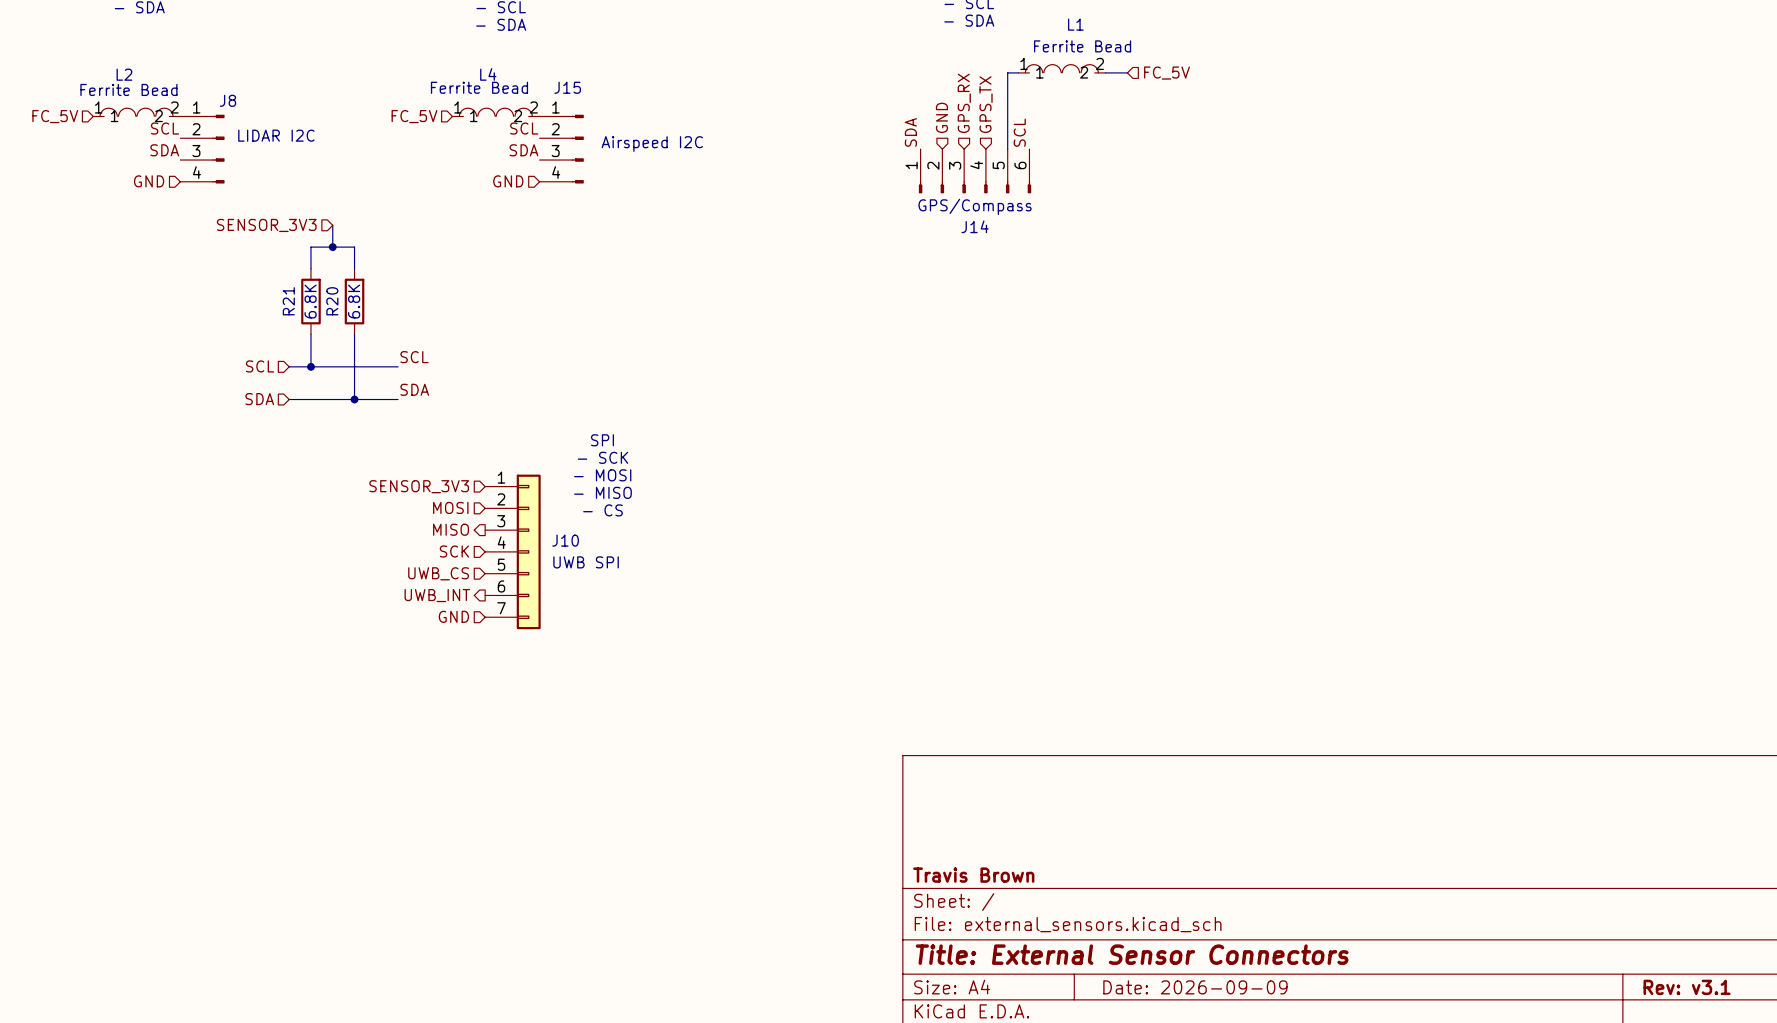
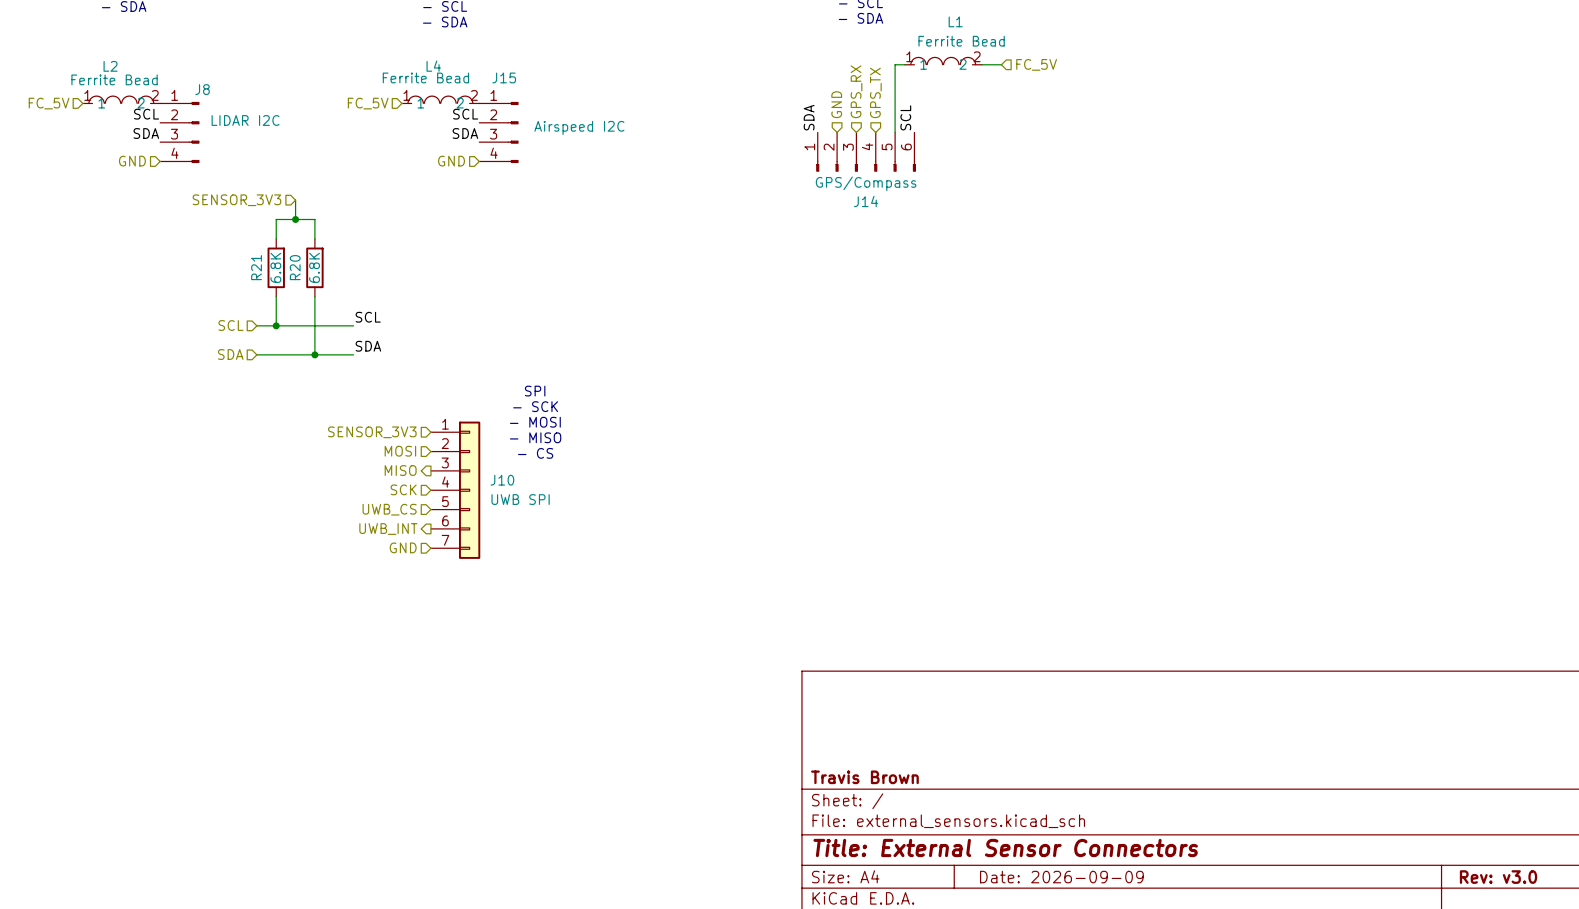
title block: Rev: v3.1 (1687, 987) -> Rev: v3.0 (1498, 877)

